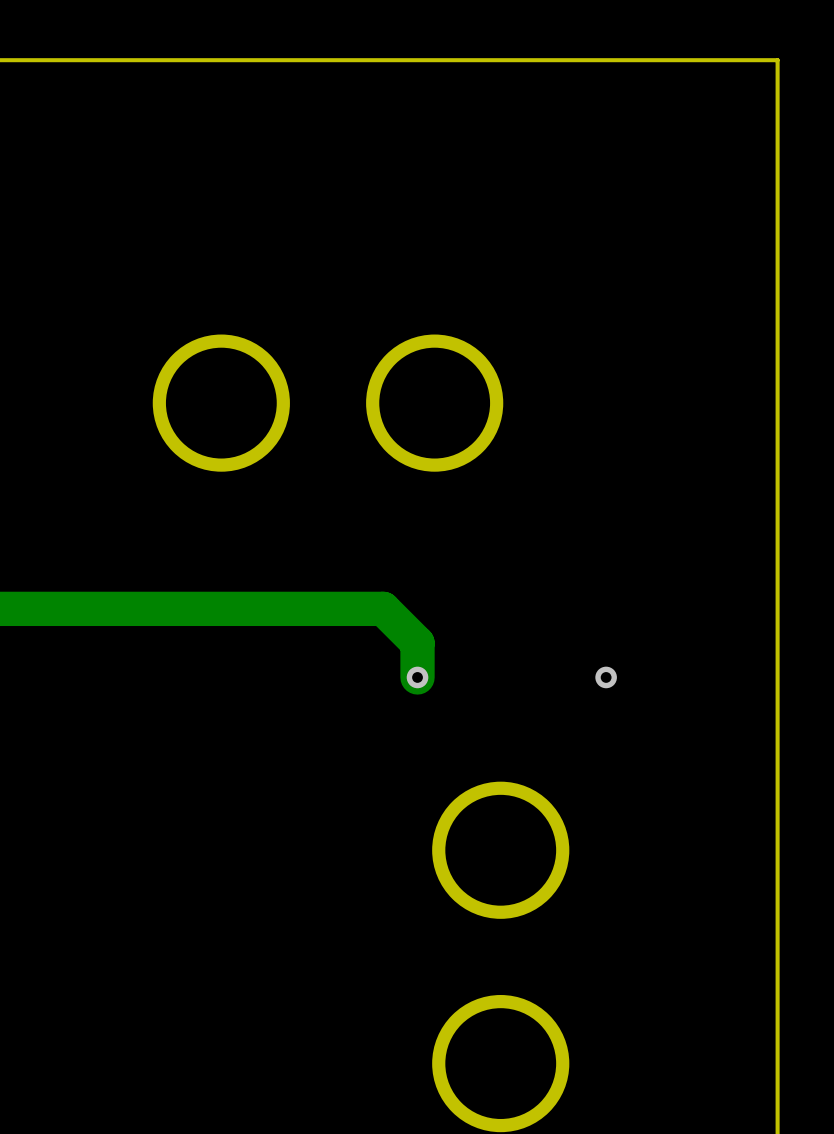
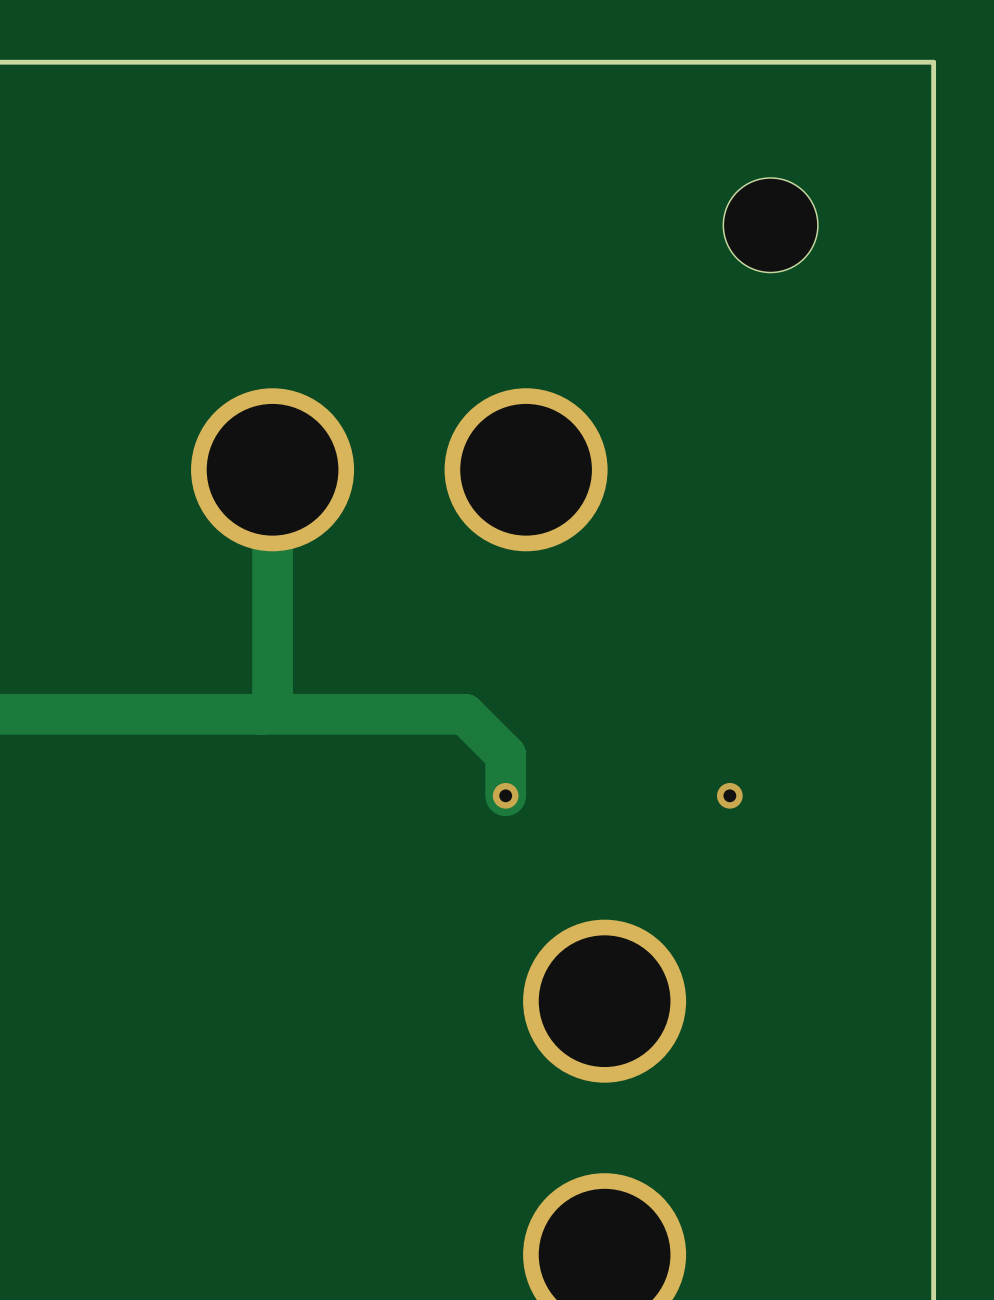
part: none -> (770, 225)
track: none -> (272, 469) (272, 702) (261, 714)

